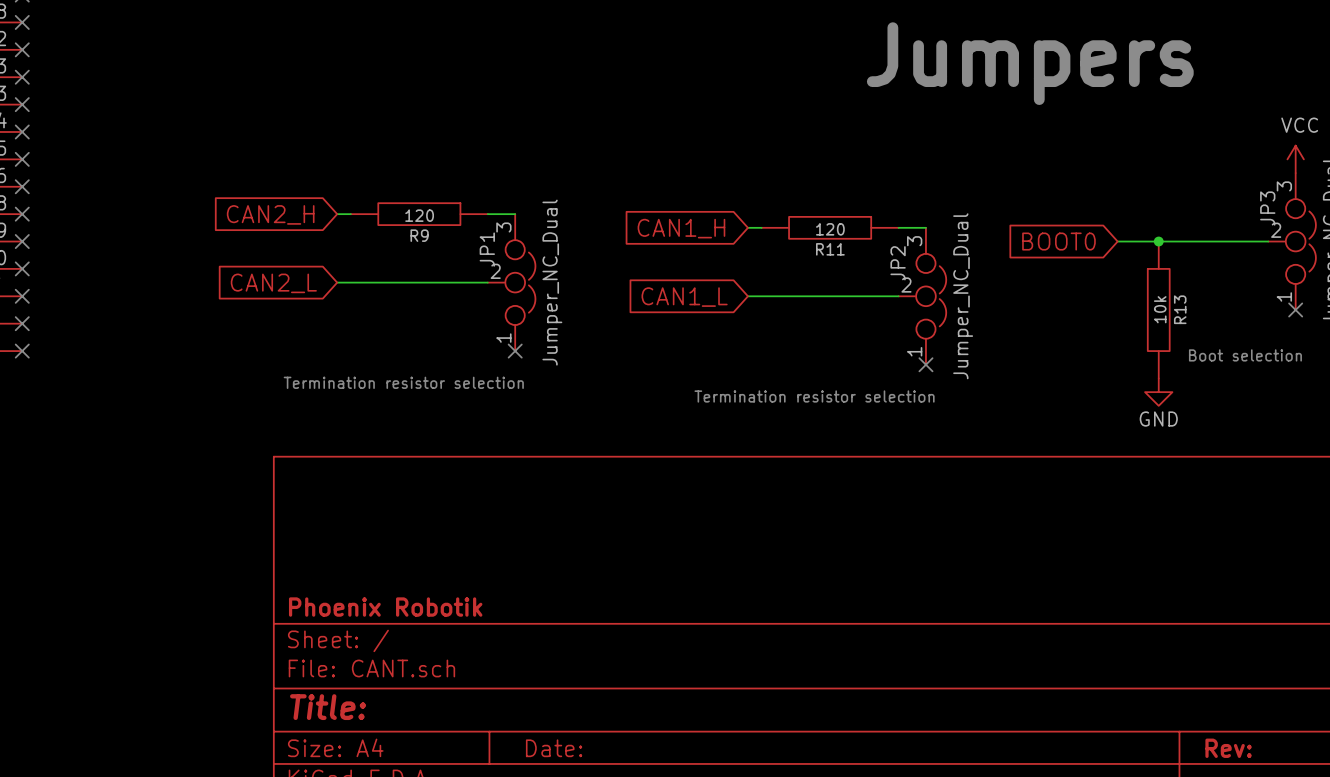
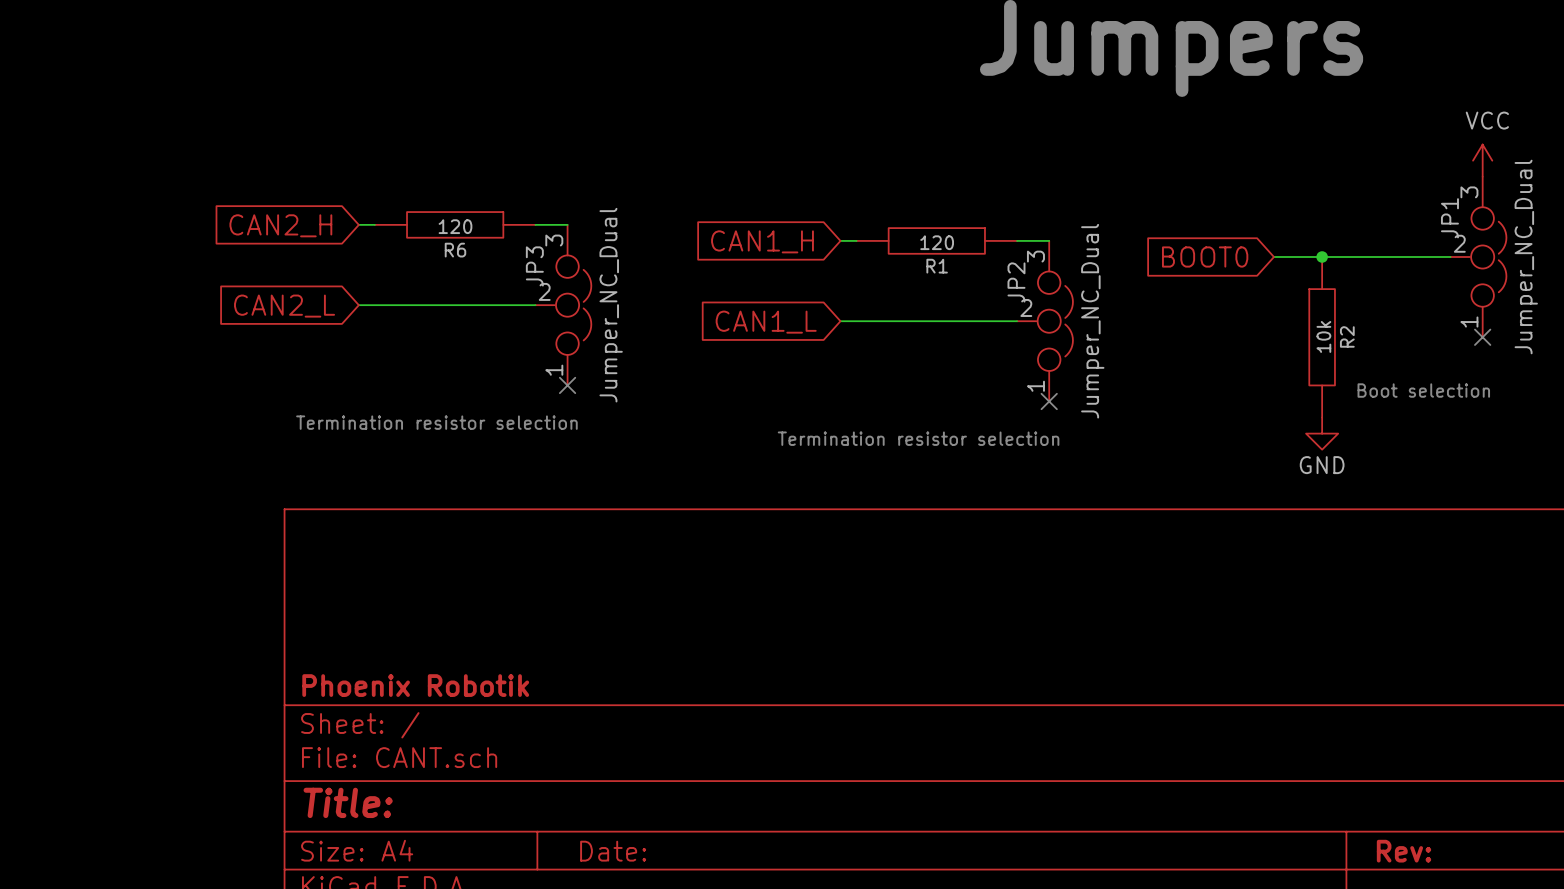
JP3 name: JP3 (1267, 208) -> JP1 (1449, 218)
R9 name: R9 (419, 235) -> R6 (455, 250)
JP1 name: JP1 (487, 249) -> JP3 (534, 266)
R11 name: R11 (830, 249) -> R1 (937, 266)
R13 name: R13 (1180, 309) -> R2 (1347, 336)

